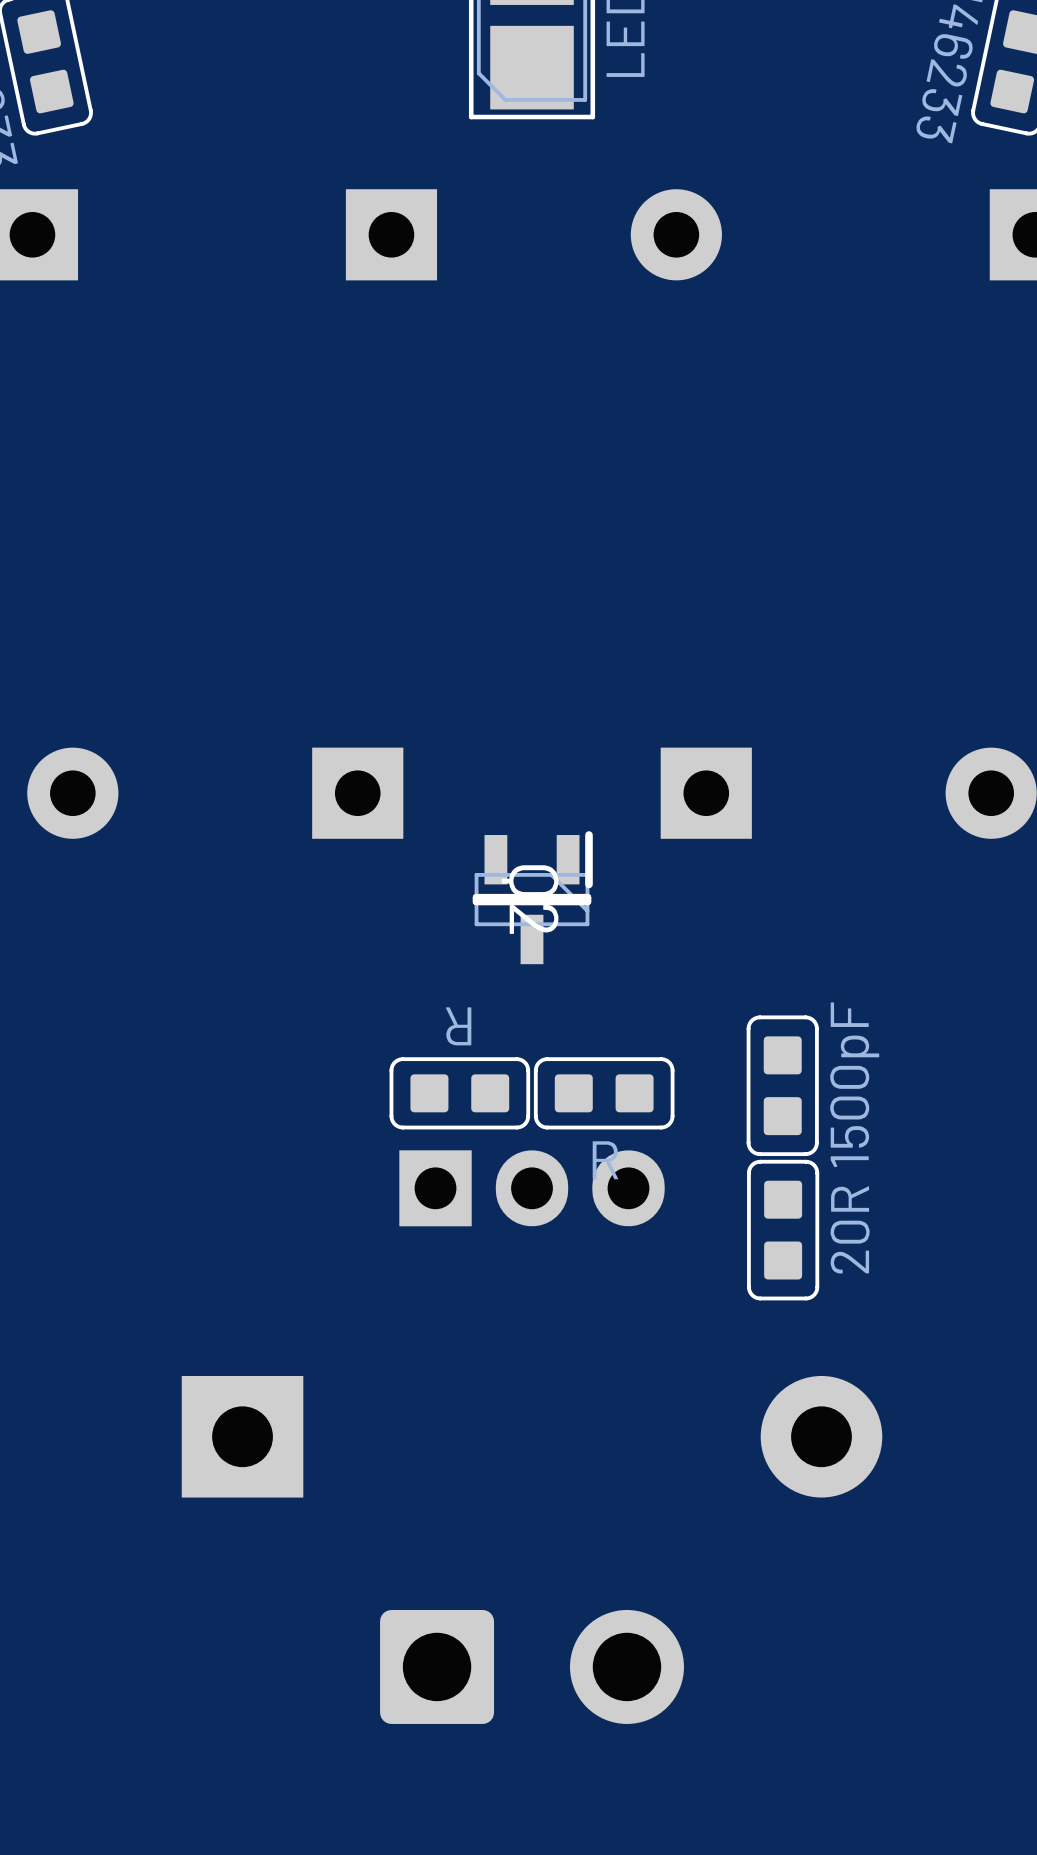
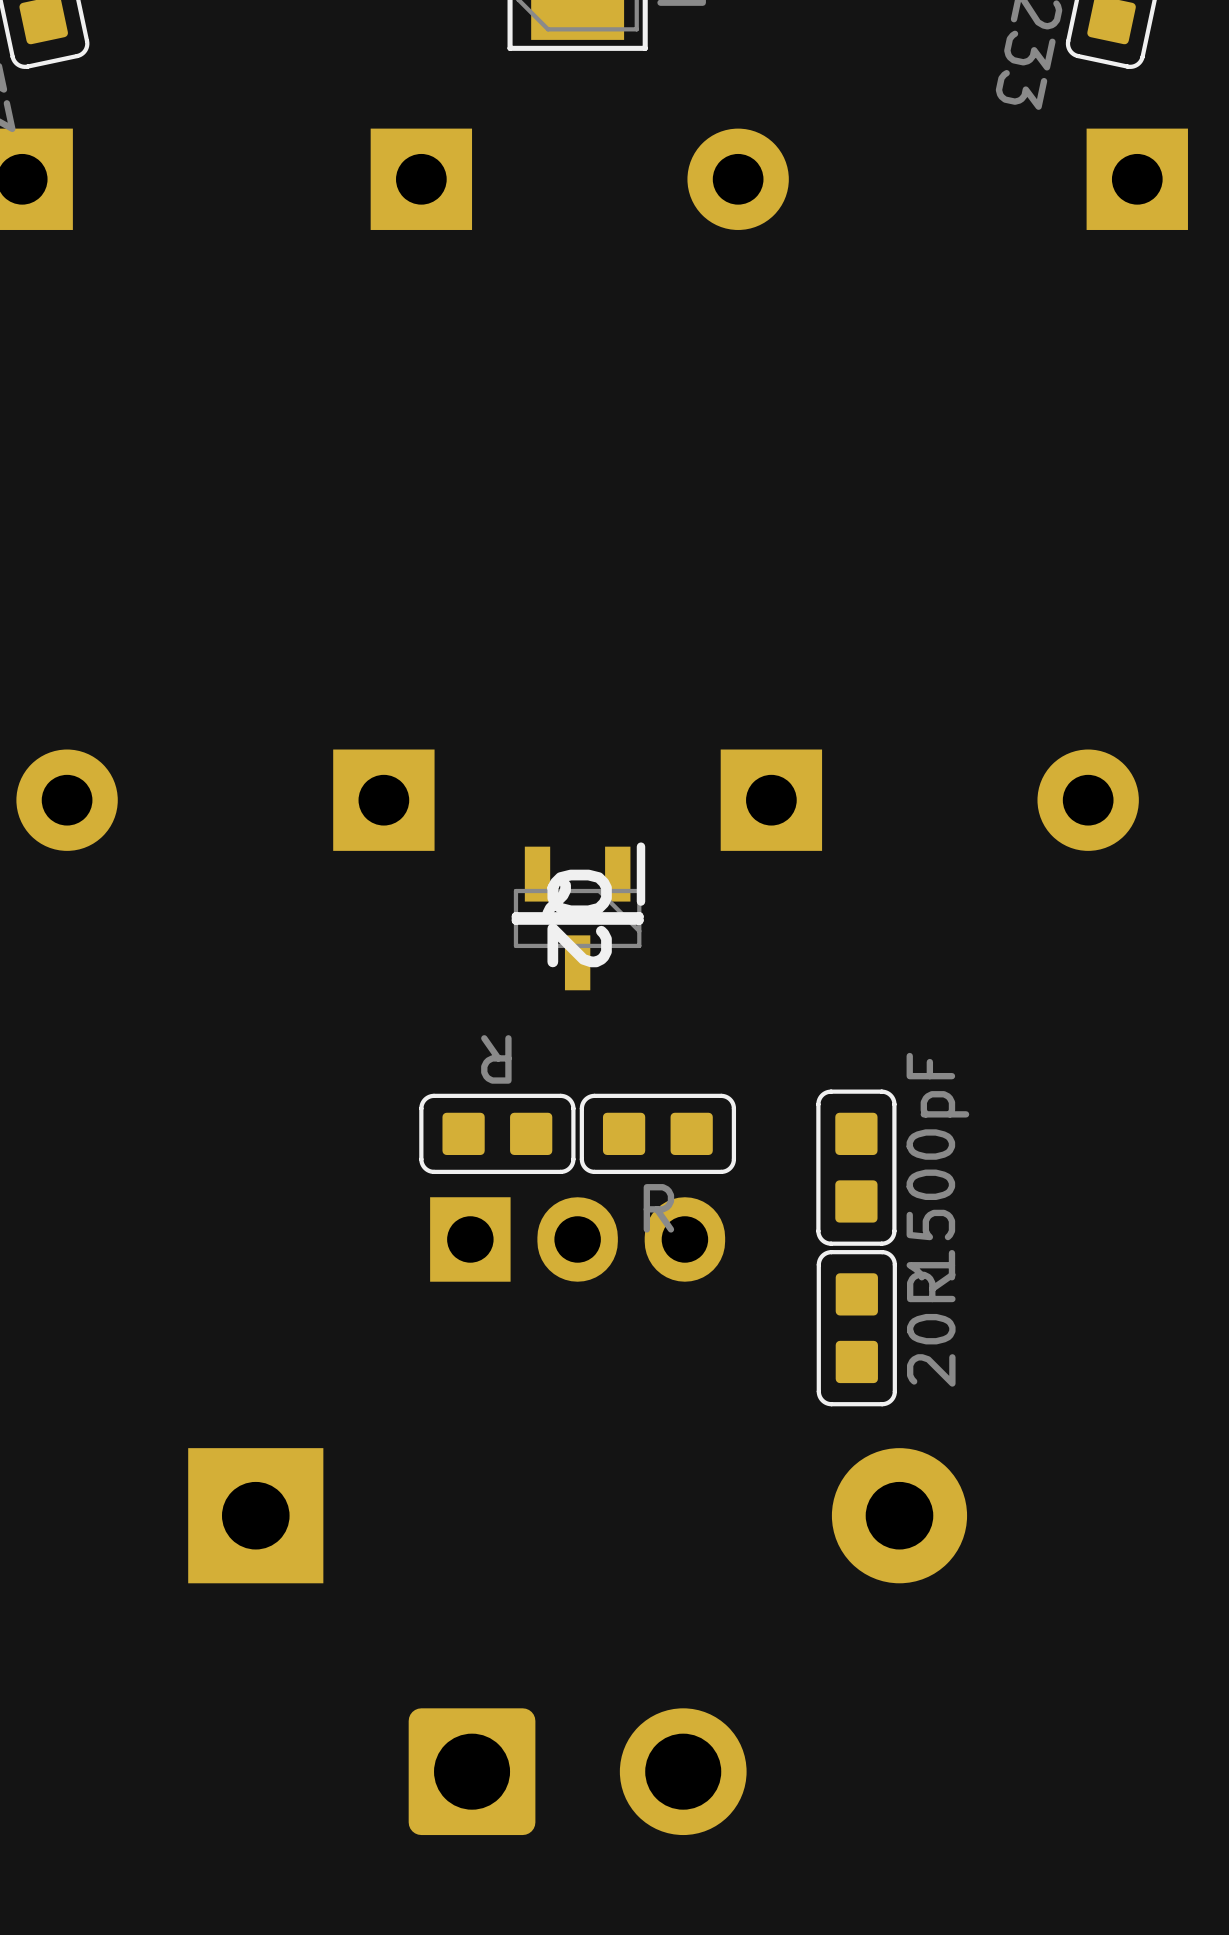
part position: (782, 1085) -> (856, 1167)
part position: (783, 1230) -> (856, 1328)

